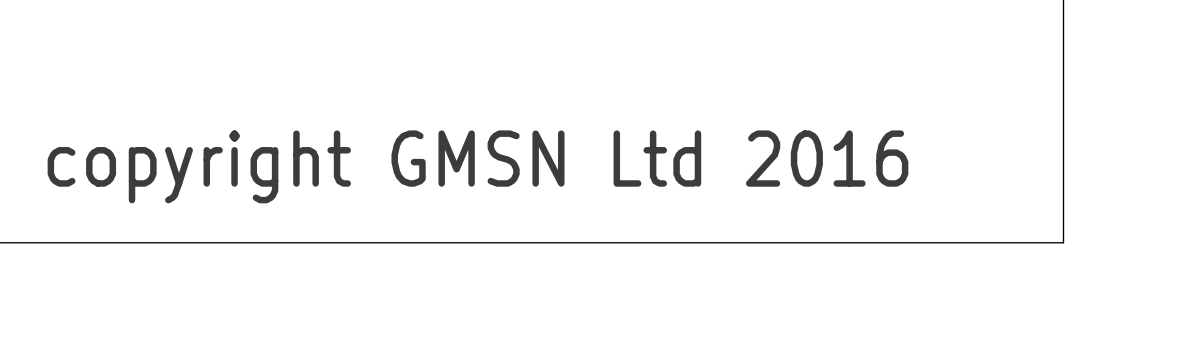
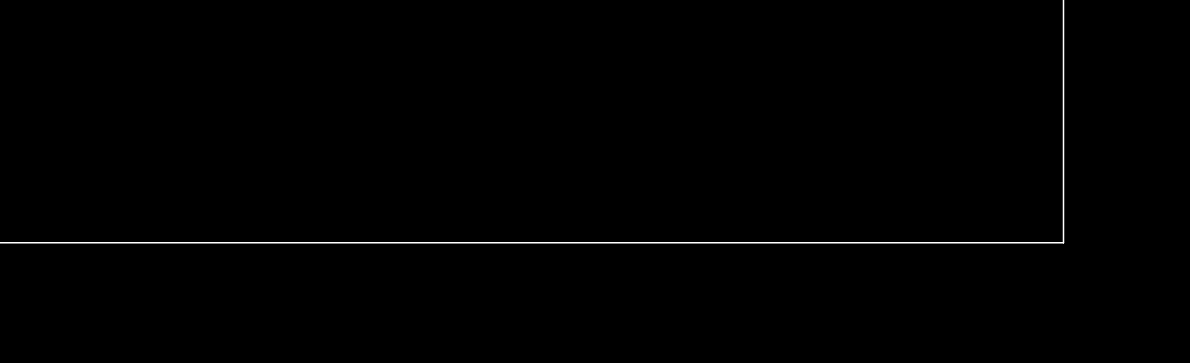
text: copyright GMSN Ltd 2016 (477, 166) -> none

